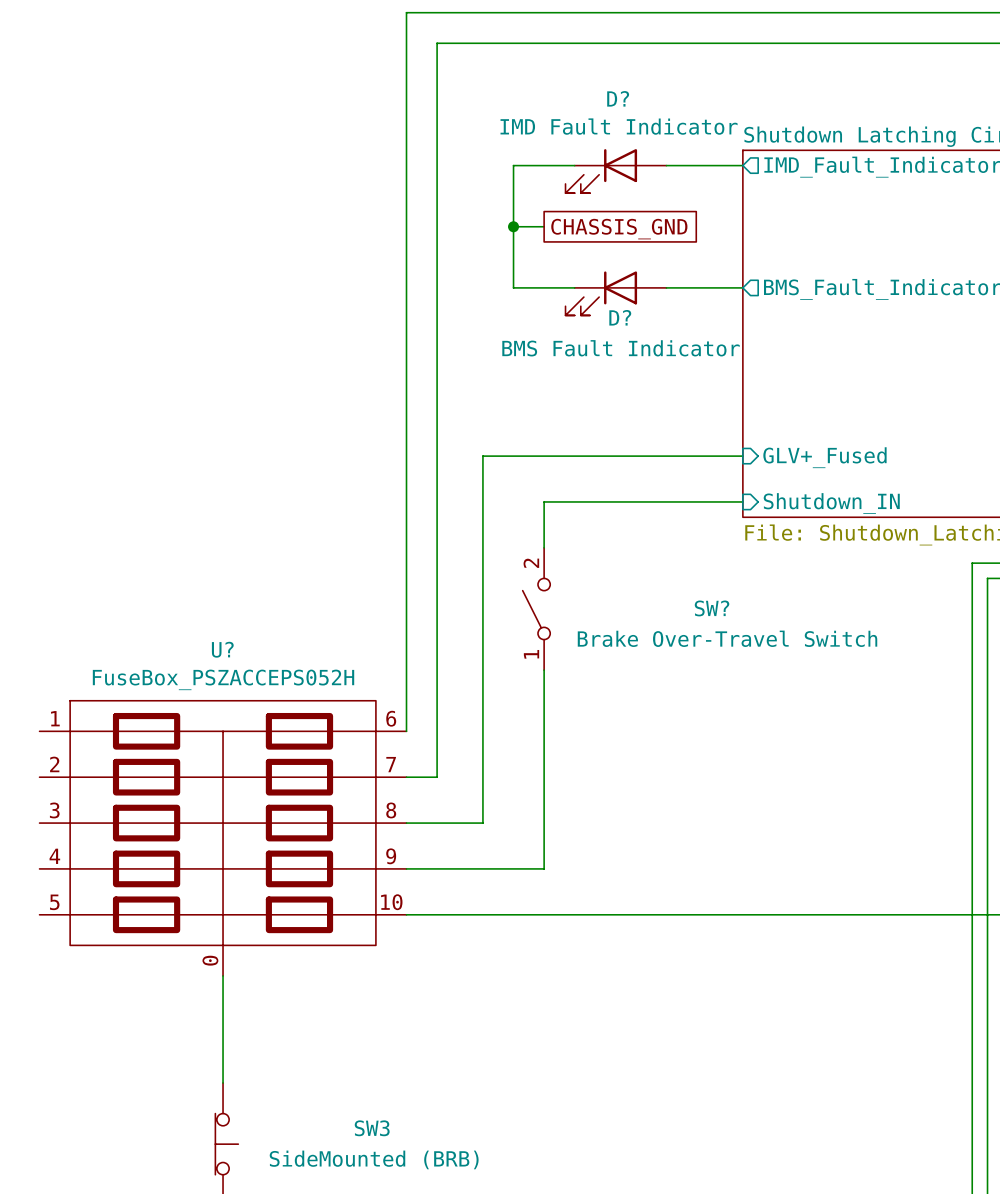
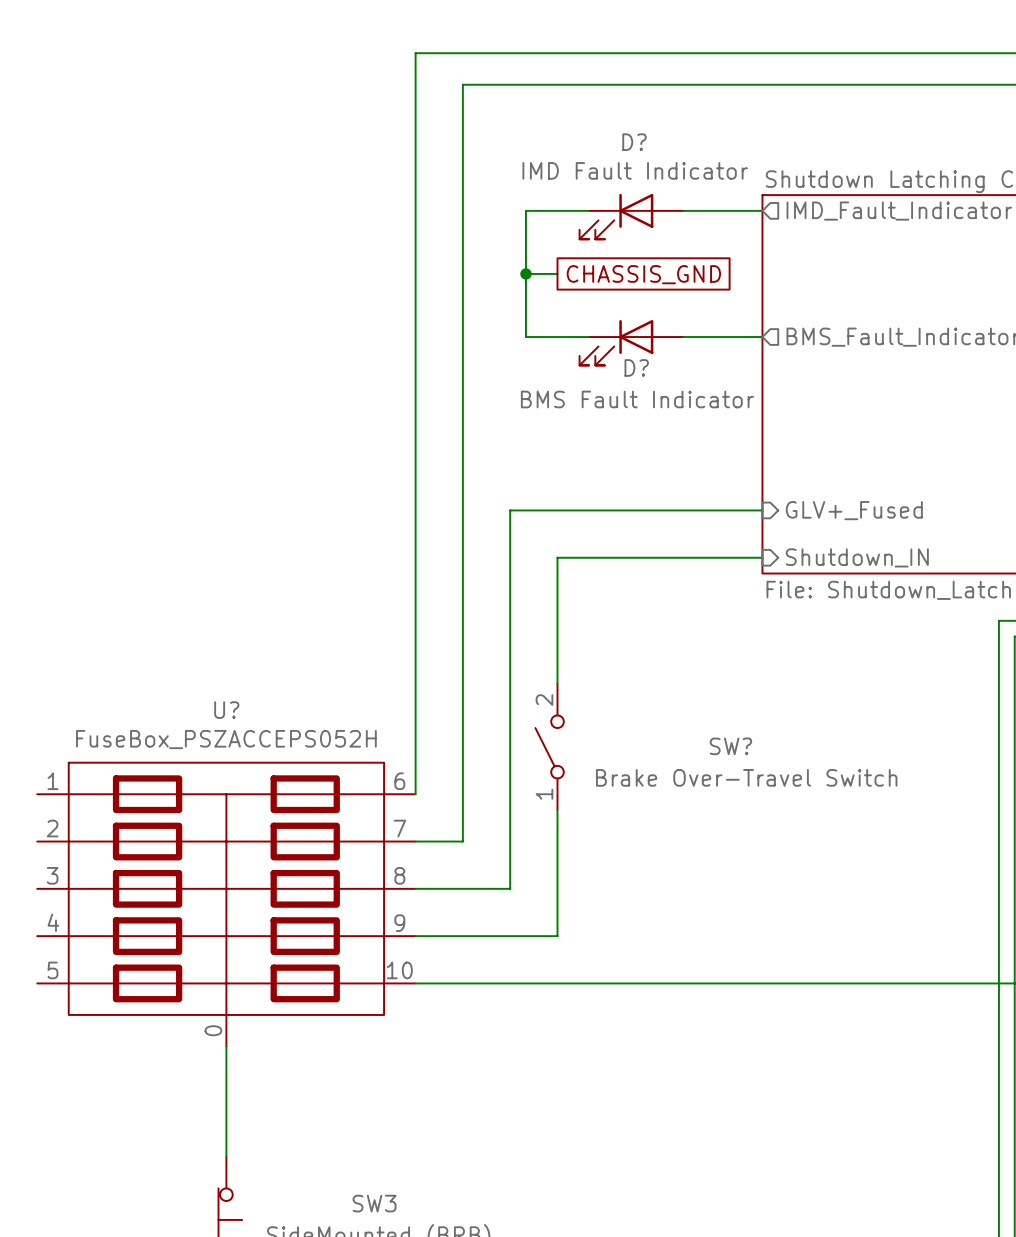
wire: (452, 43) (437, 43) (437, 777) -> (462, 84) (462, 841) (447, 841)
wire: (498, 456) (482, 456) (482, 823) -> (510, 510) (510, 888) (494, 888)
SW? position: (536, 609) -> (549, 746)
wire: (544, 670) (544, 746) -> (557, 605) (557, 683)

